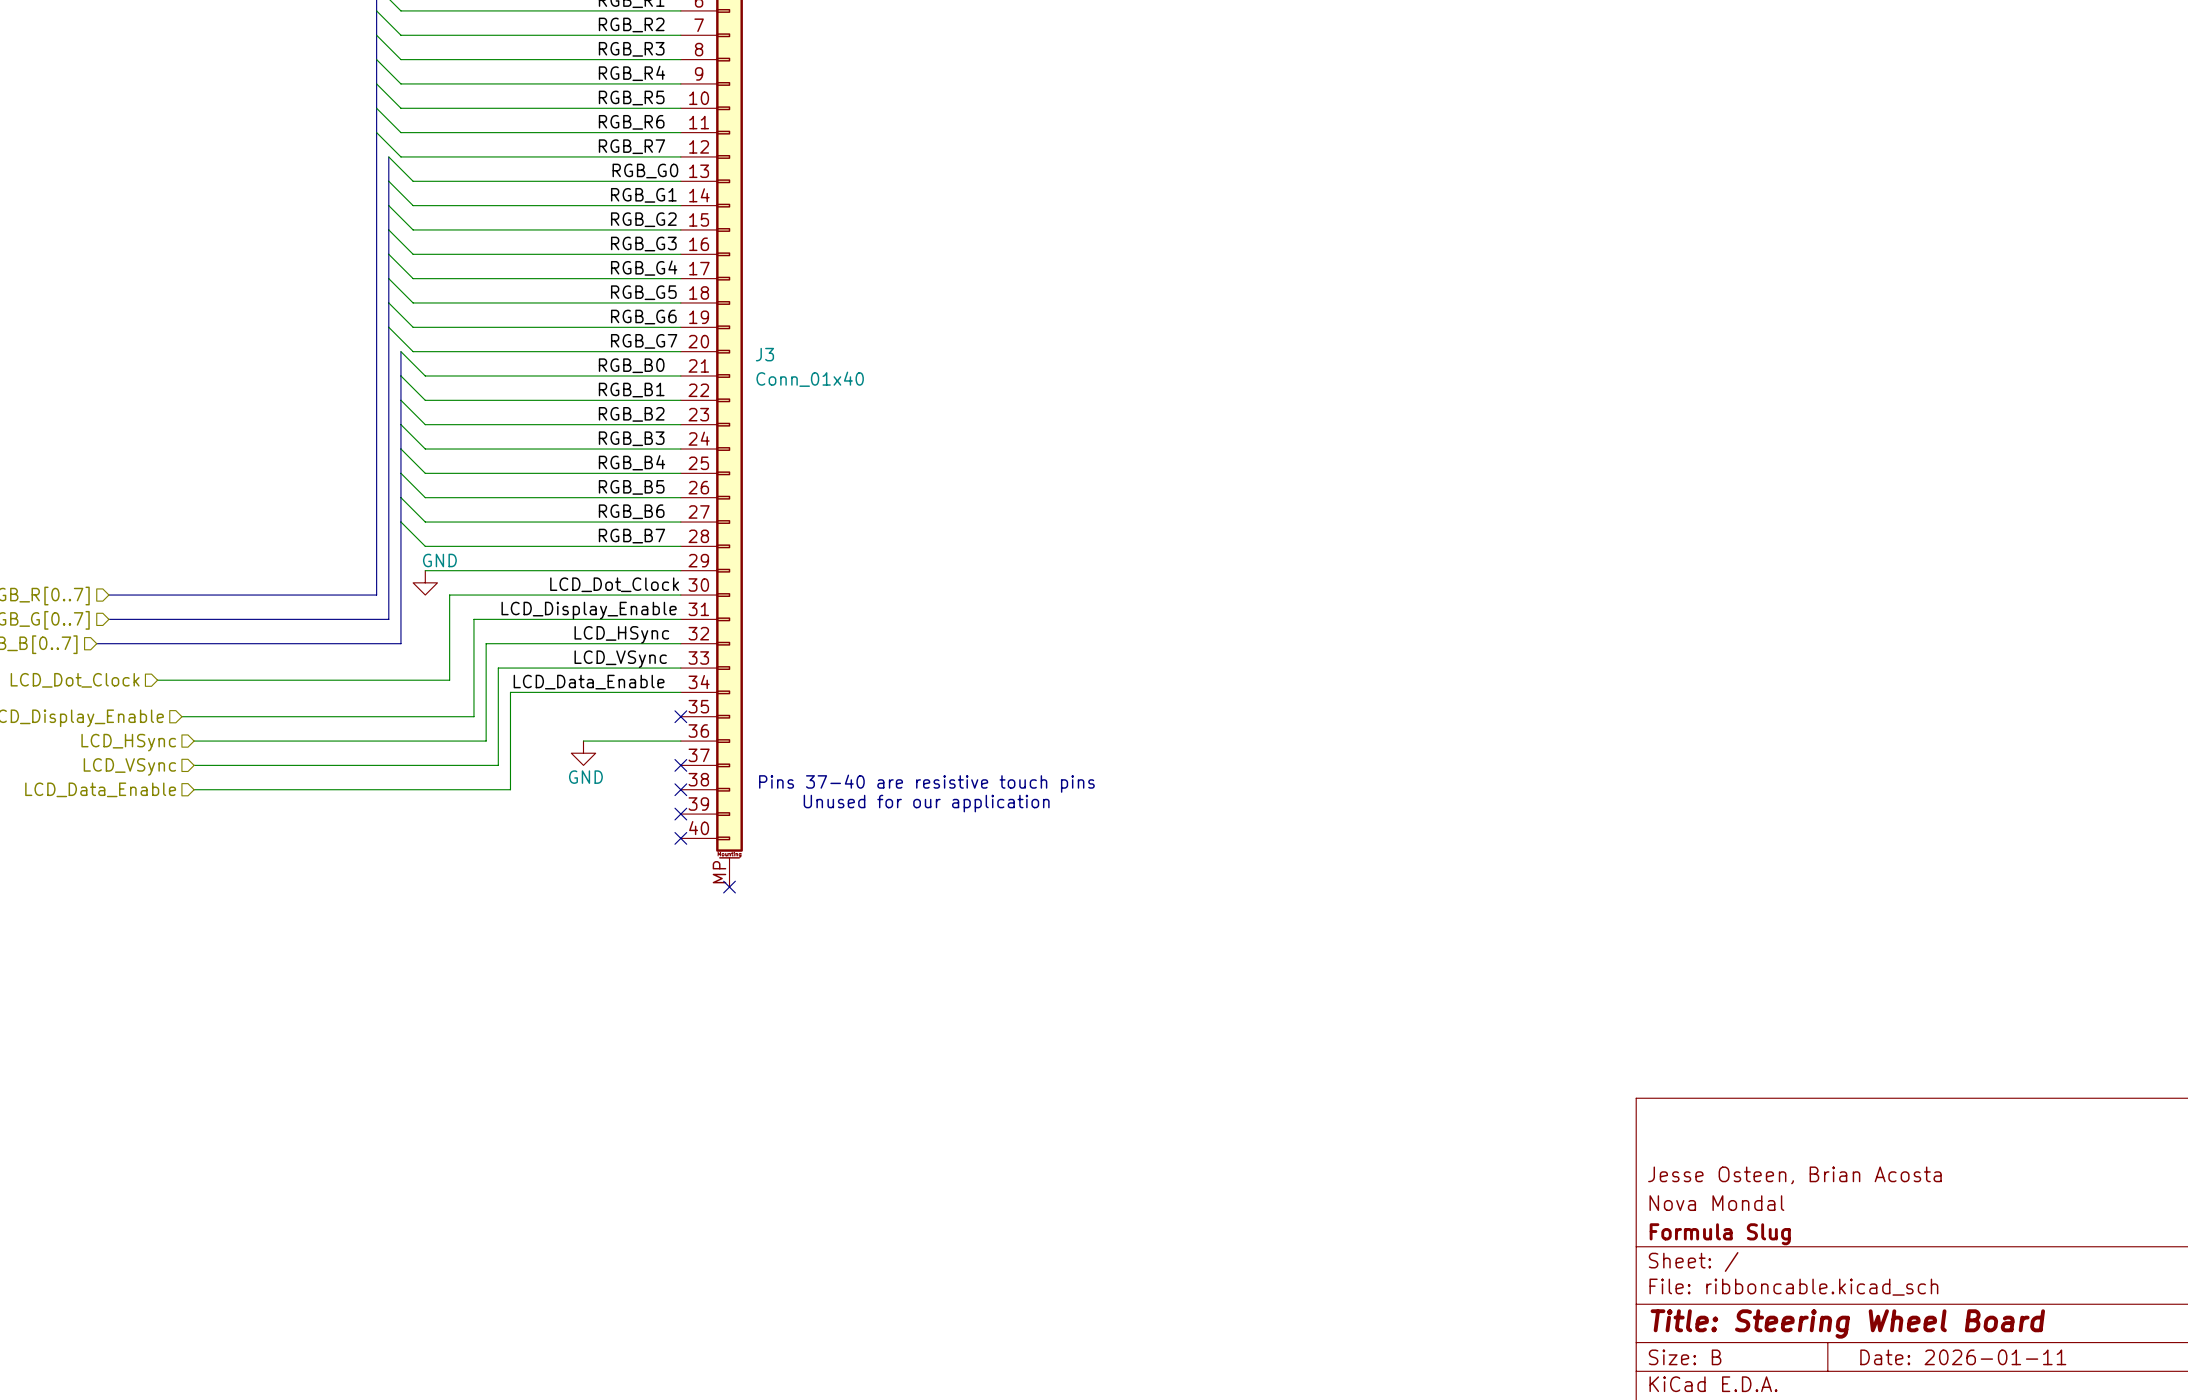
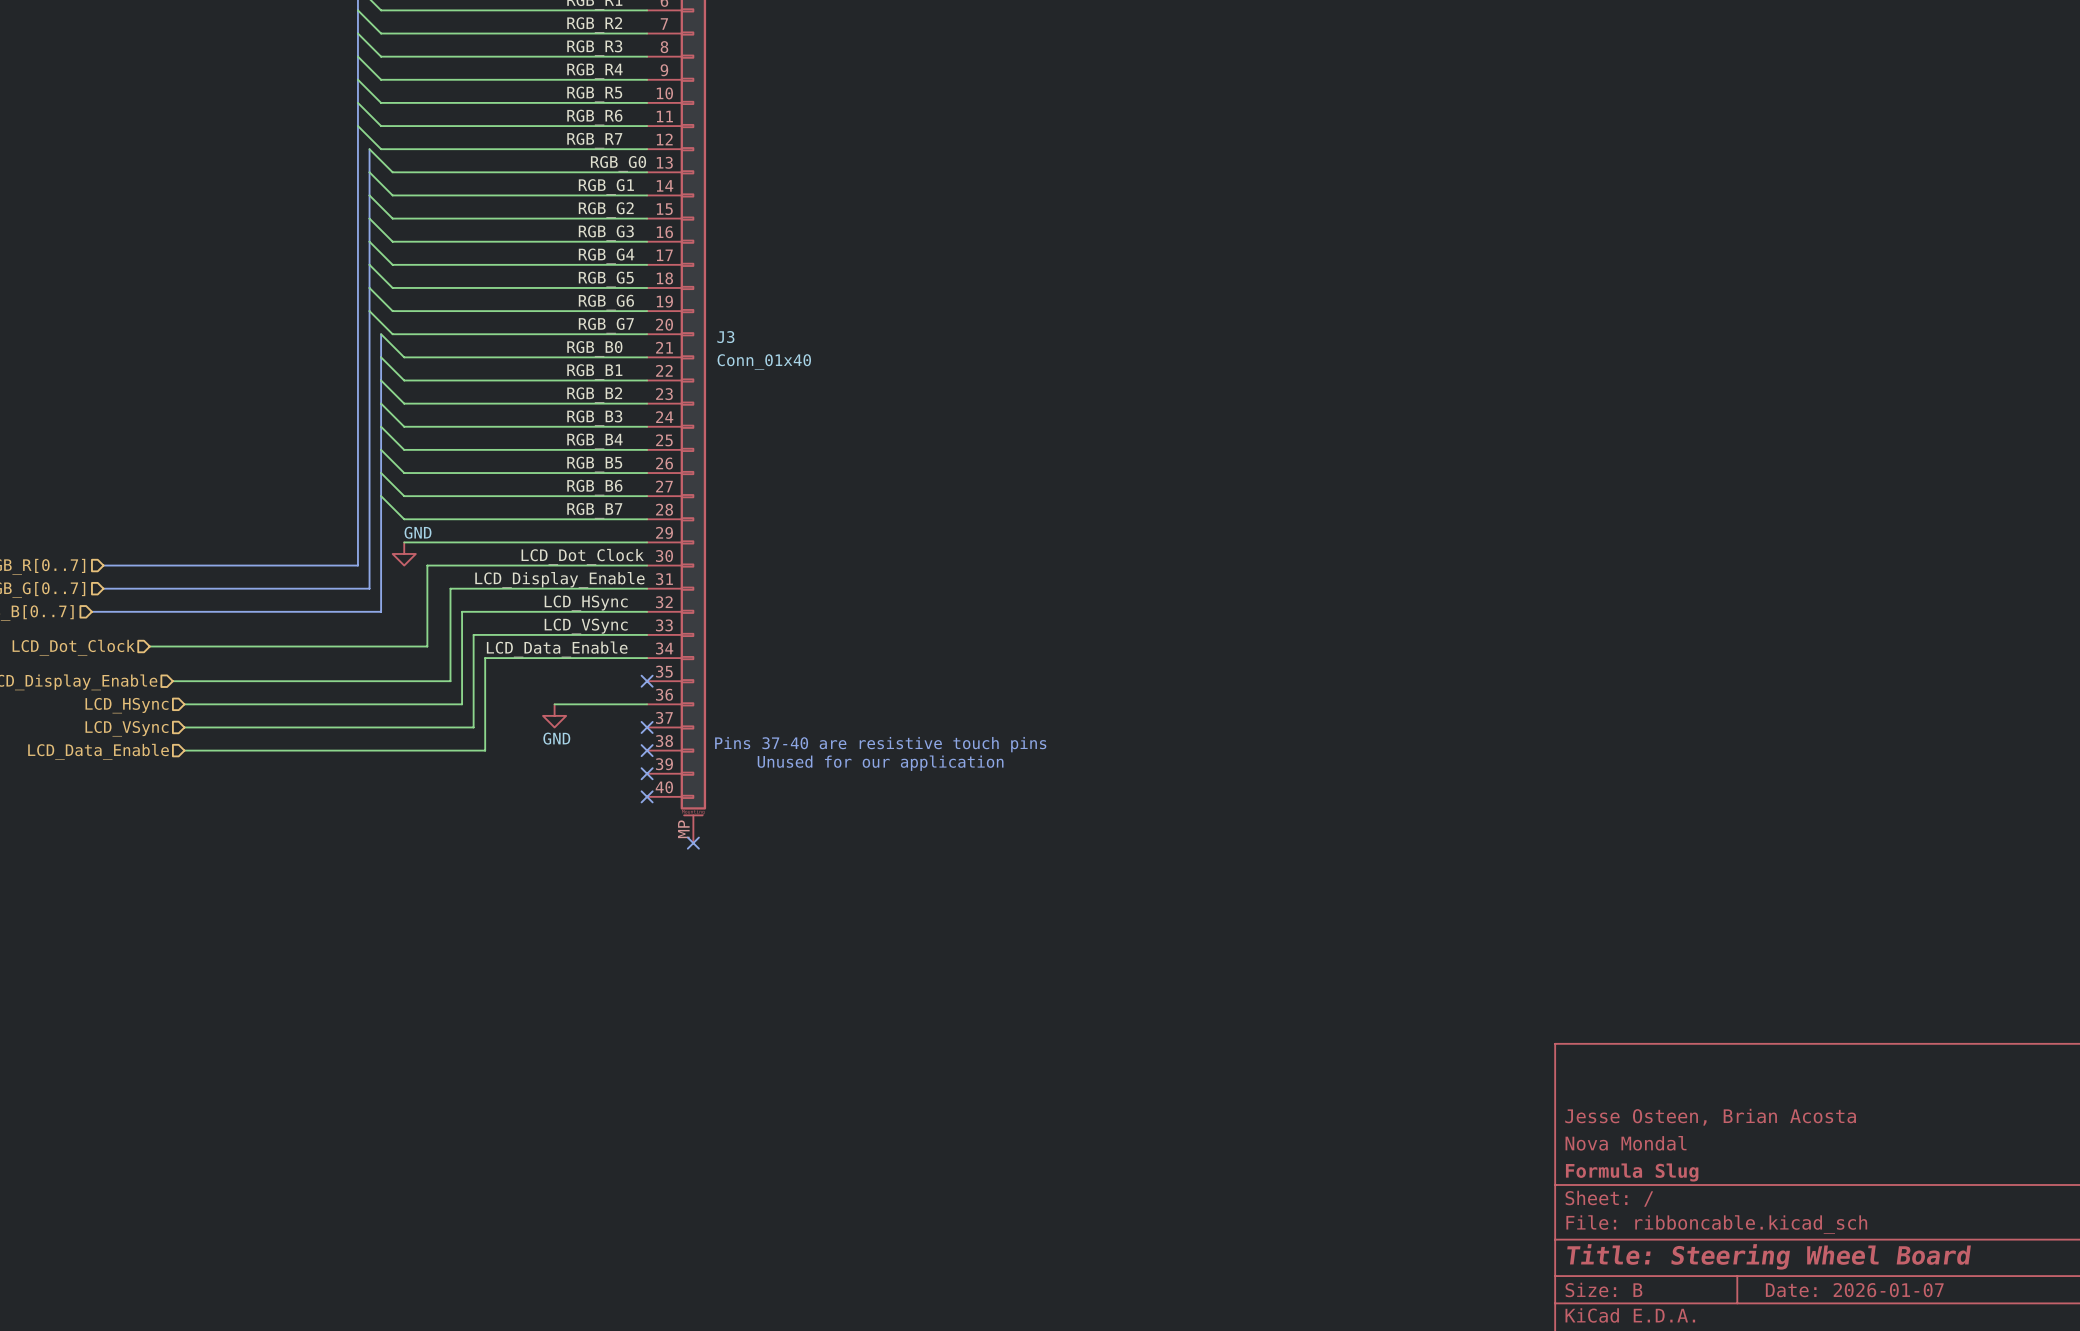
title block: Date: 2026-01-11 (1963, 1357) -> Date: 2026-01-07 (1854, 1290)

